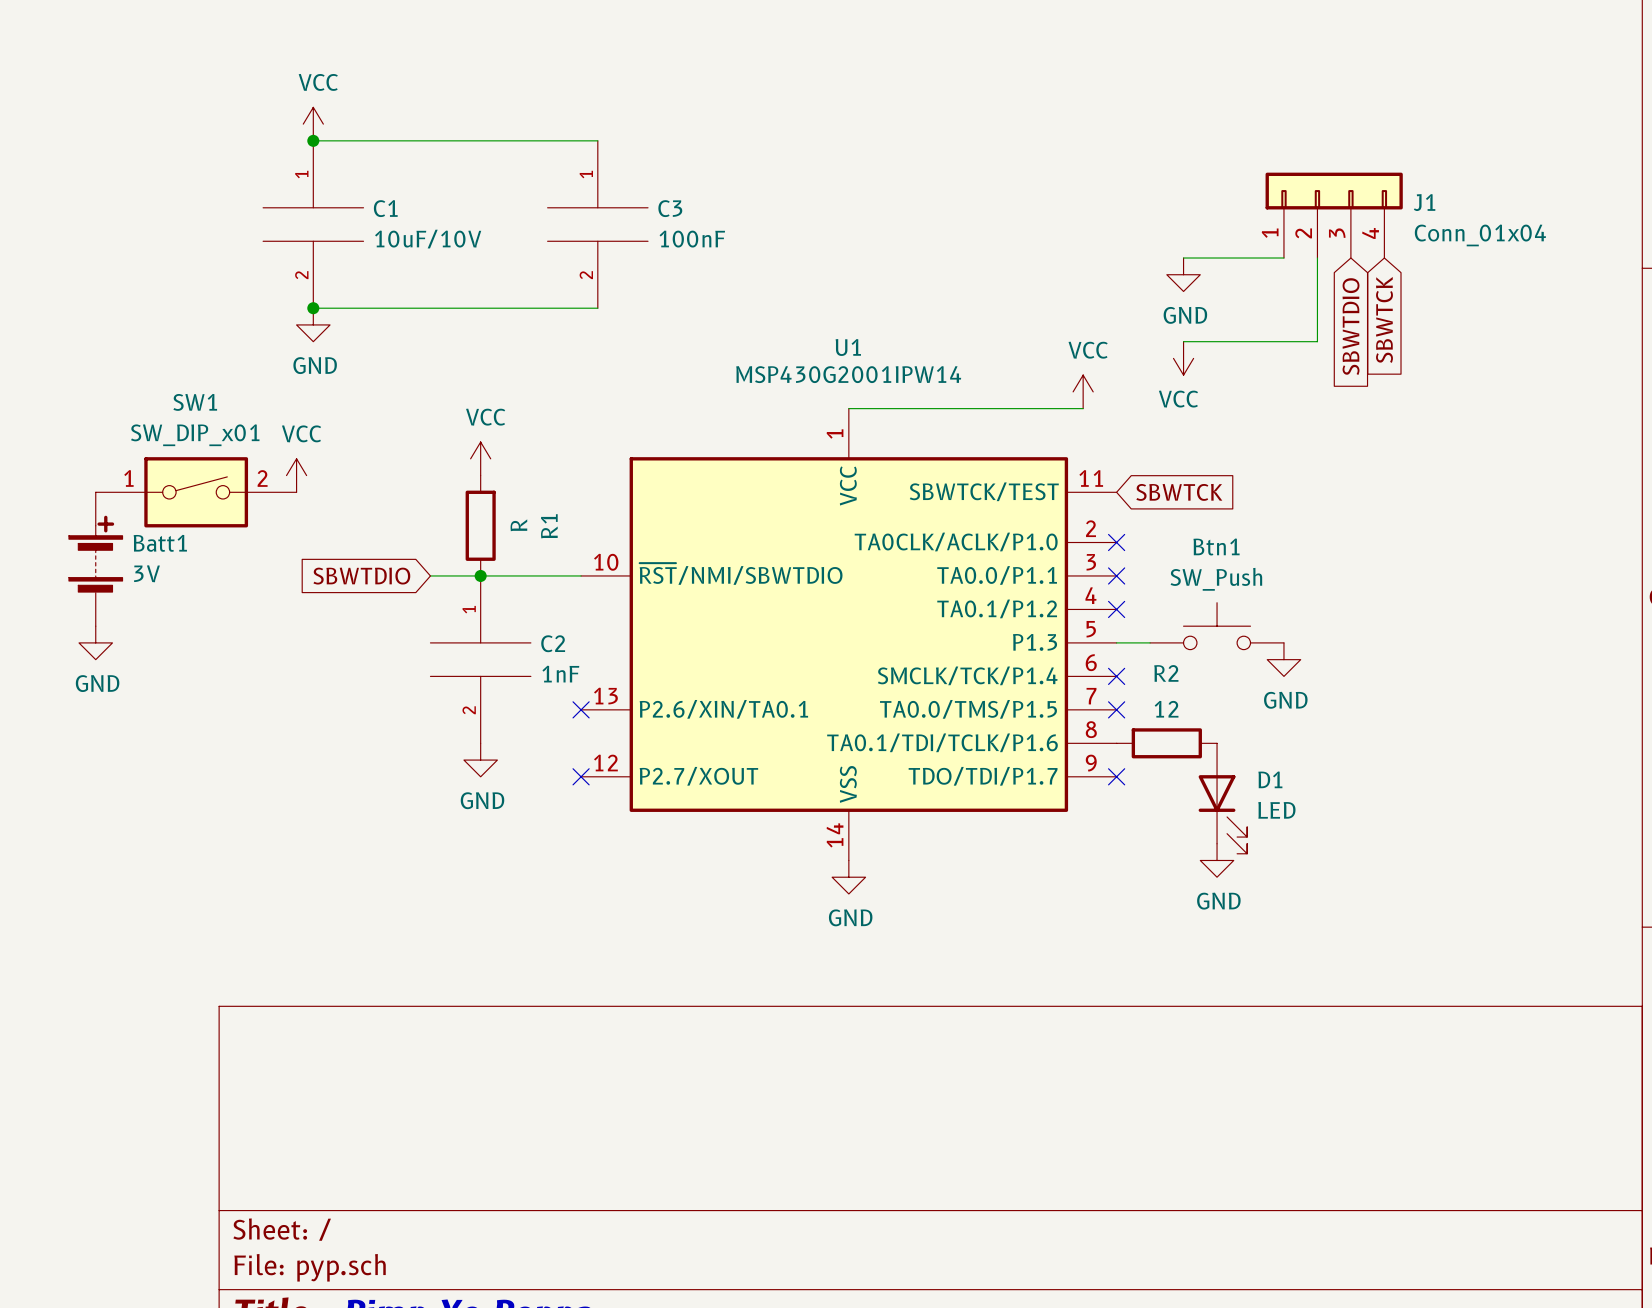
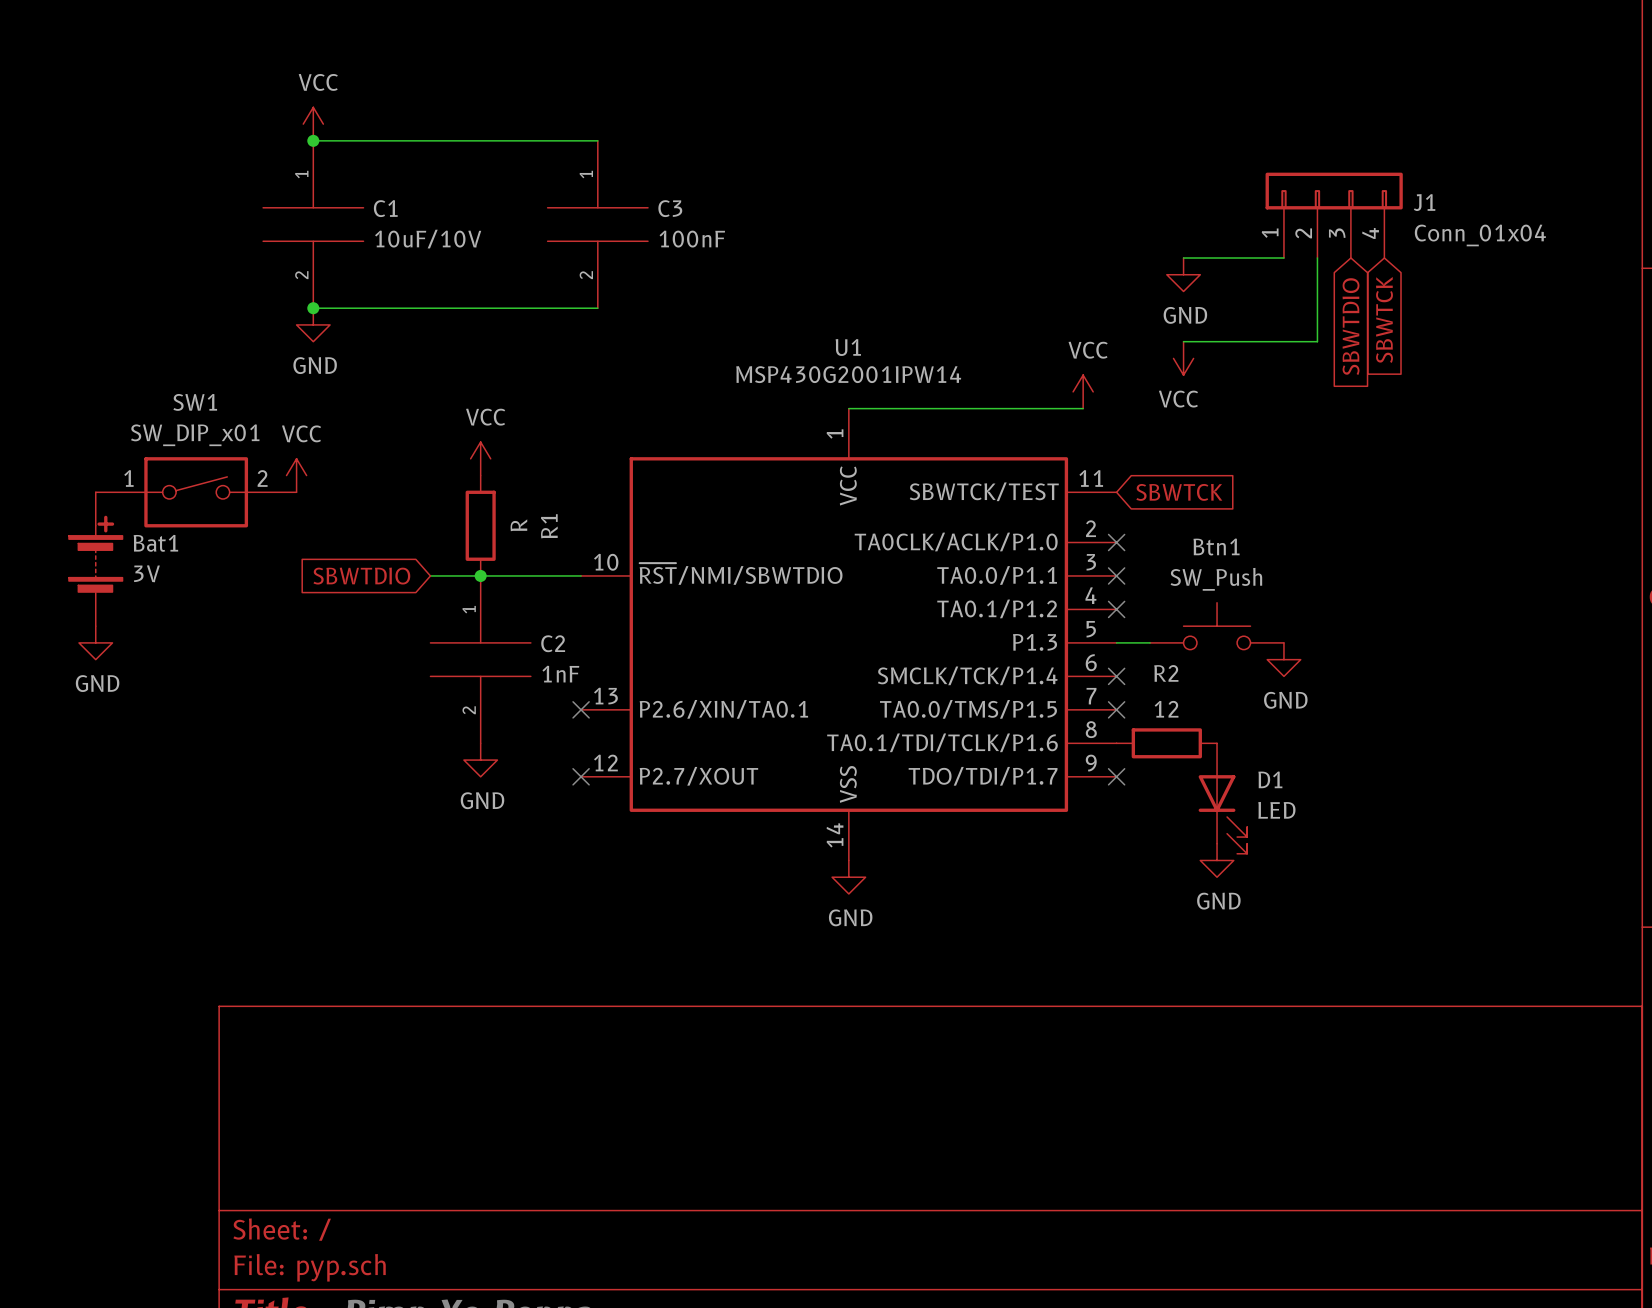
Batt1 name: Batt1 (160, 543) -> Bat1 (155, 543)

